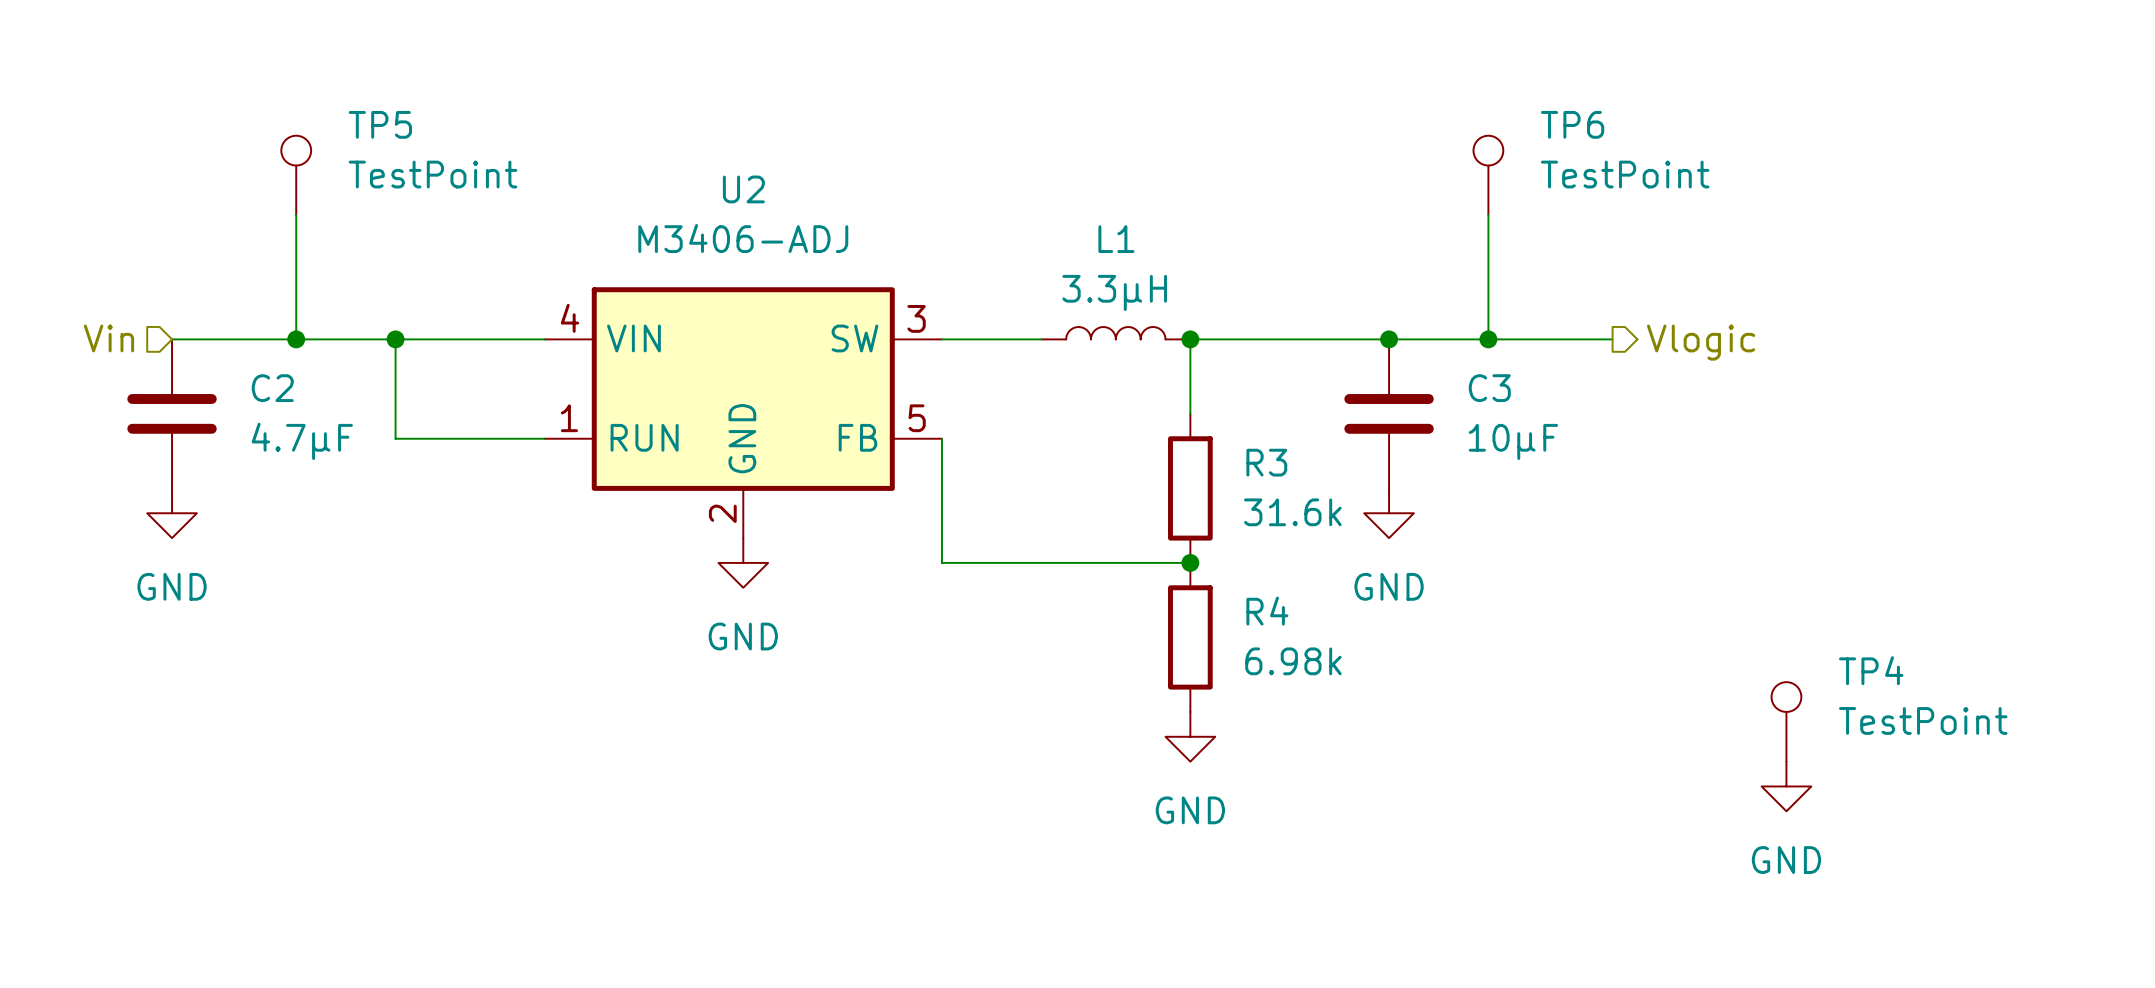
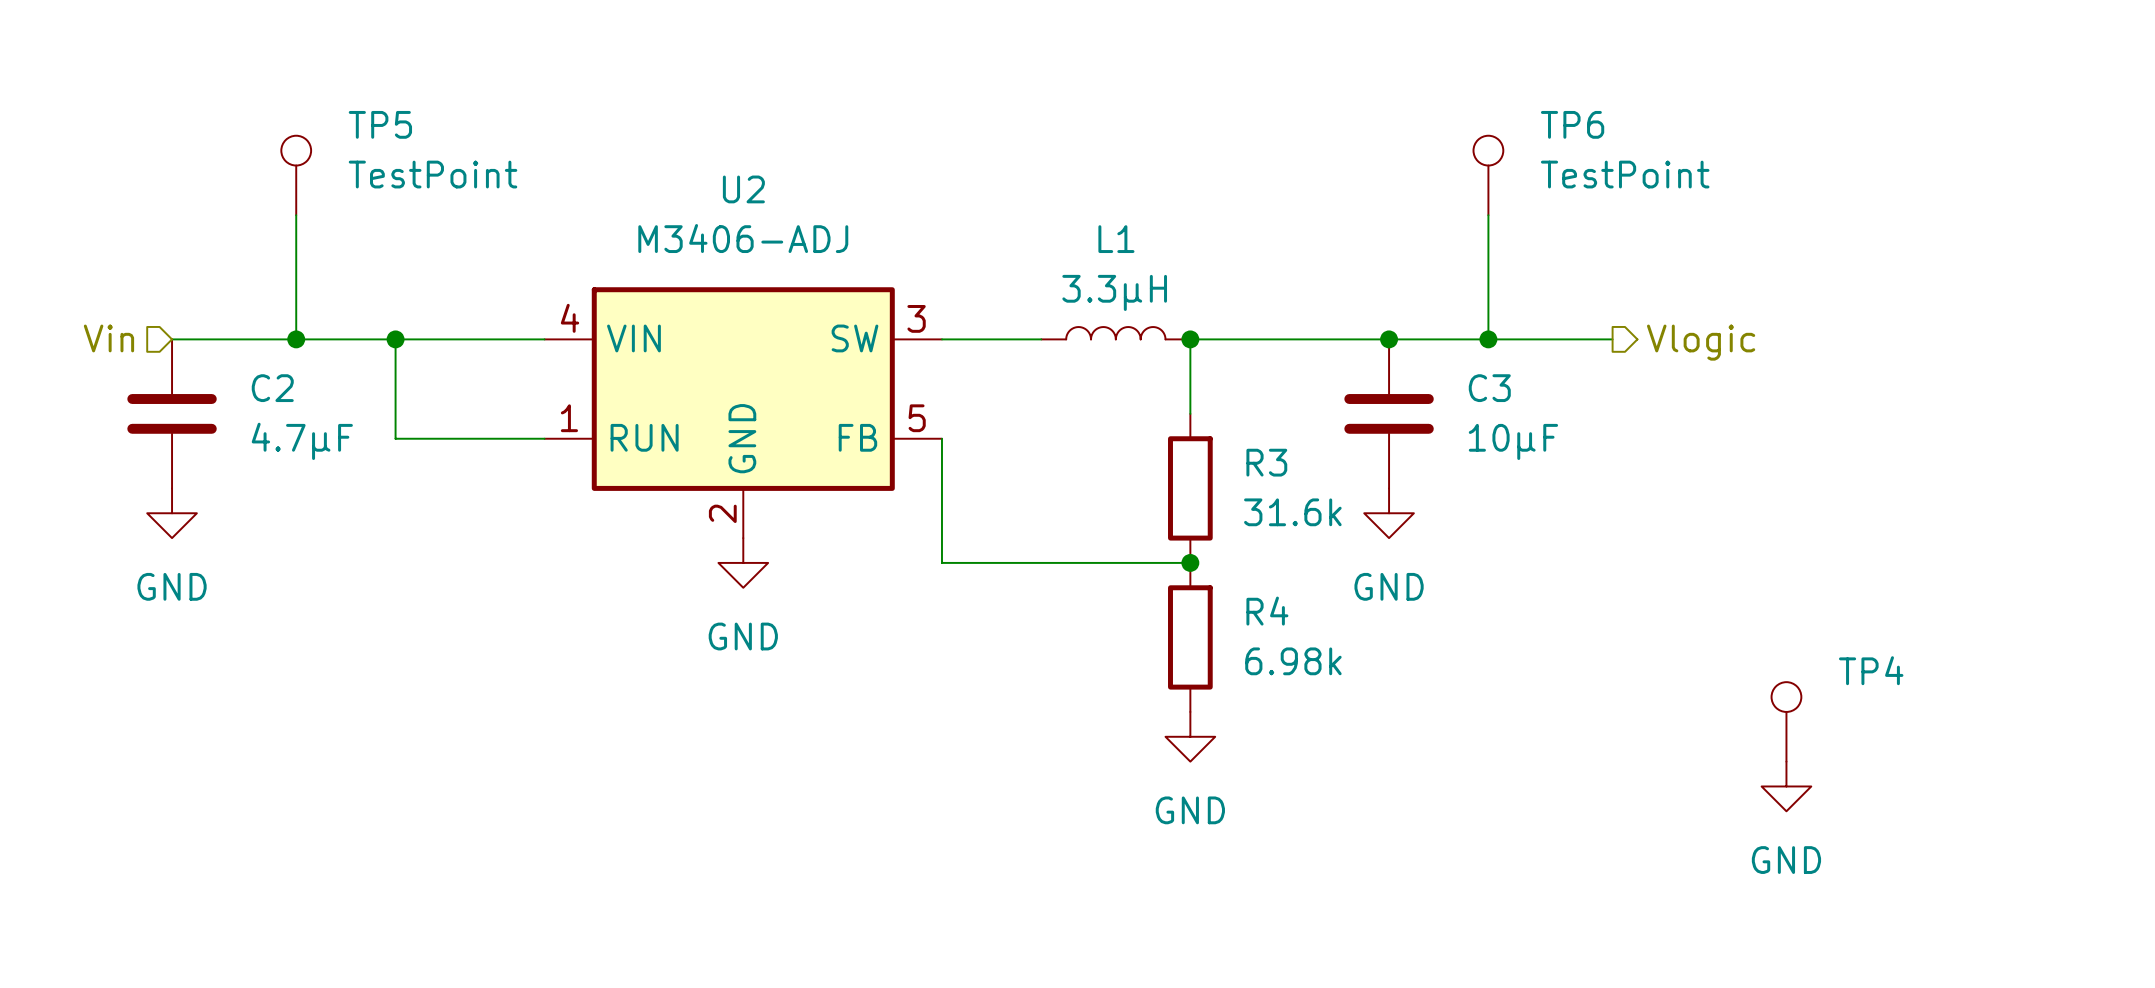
TP4 value: TestPoint (1923, 720) -> none

